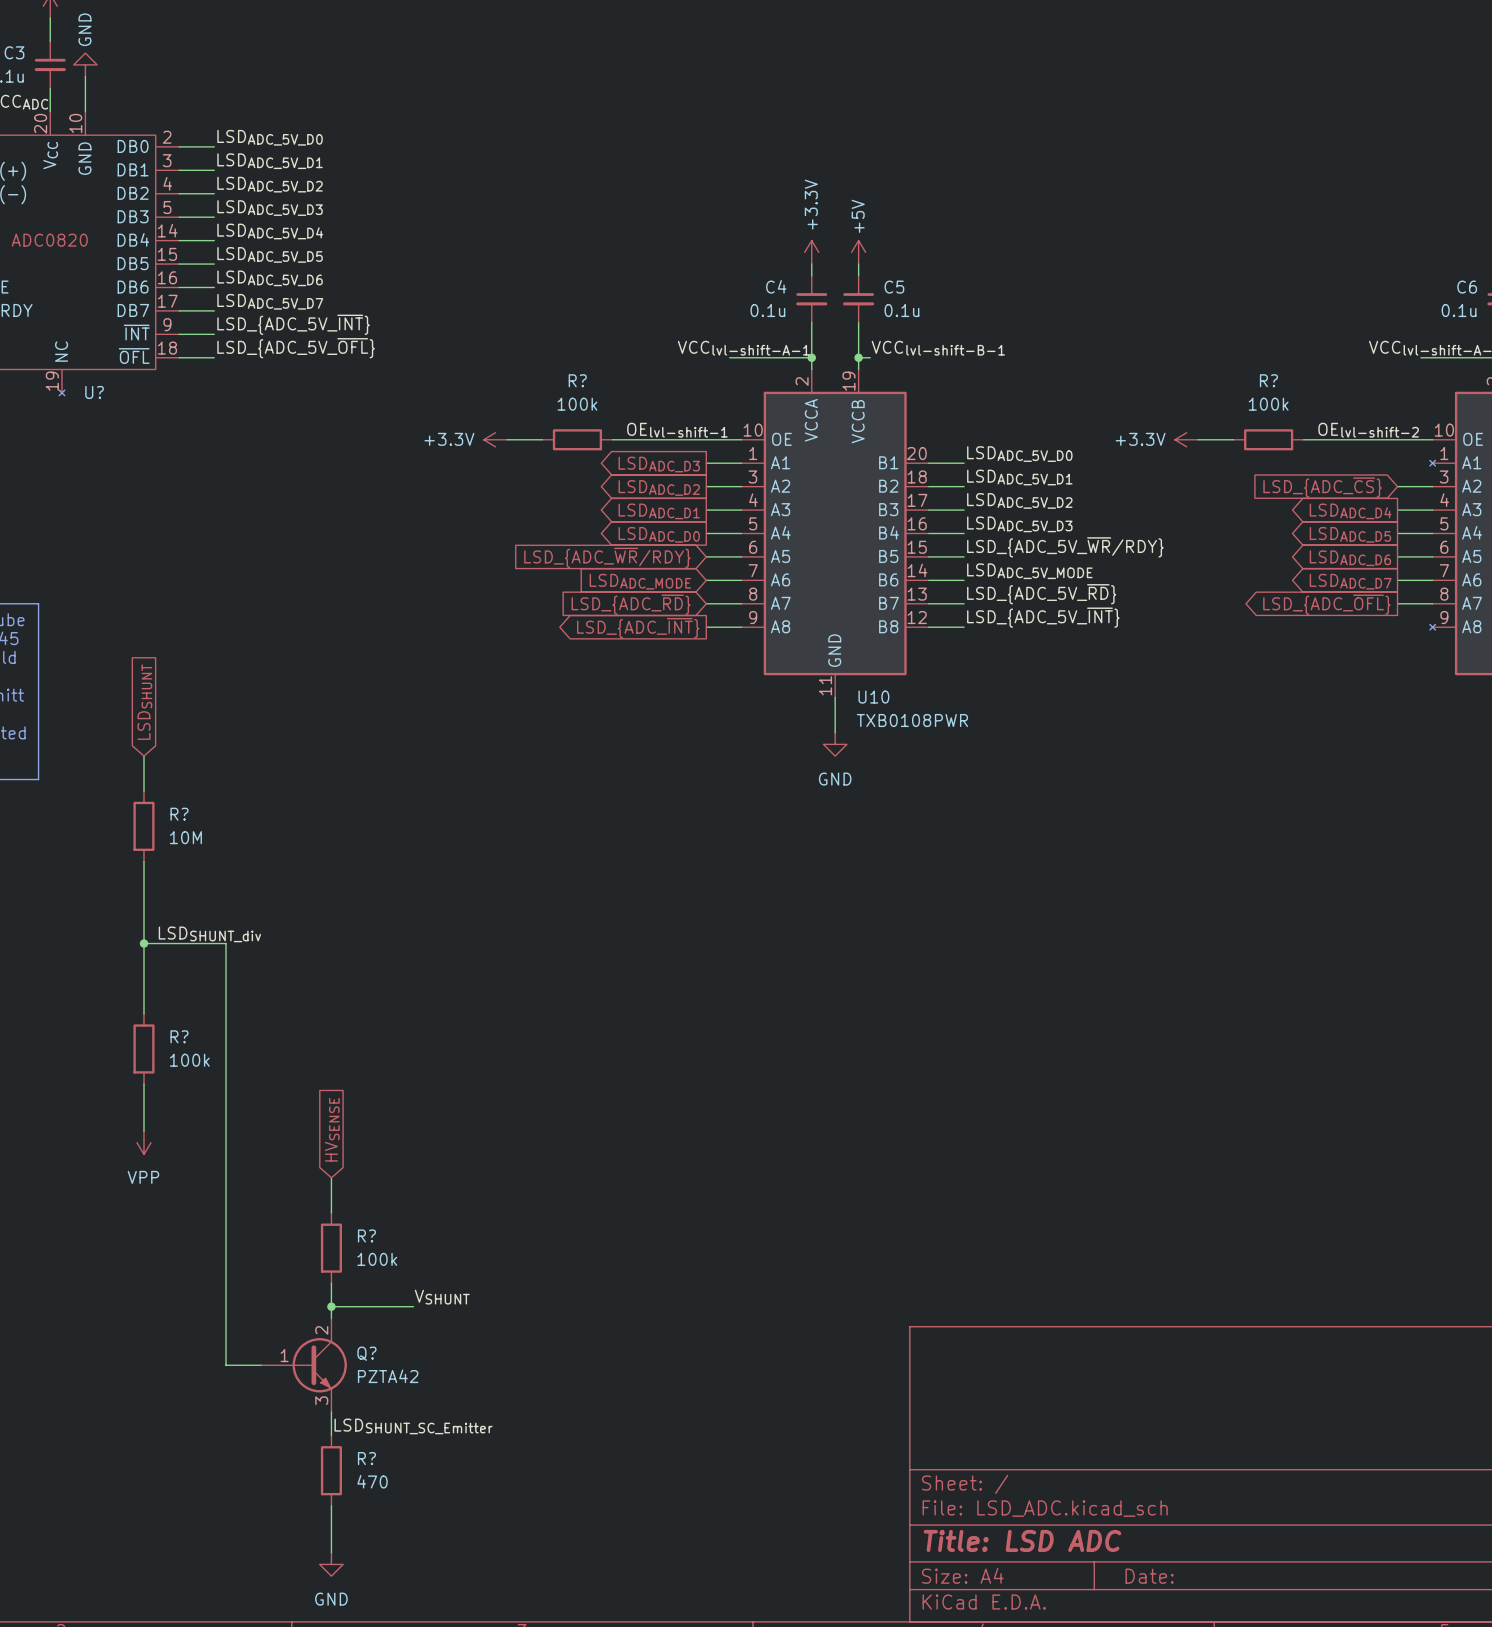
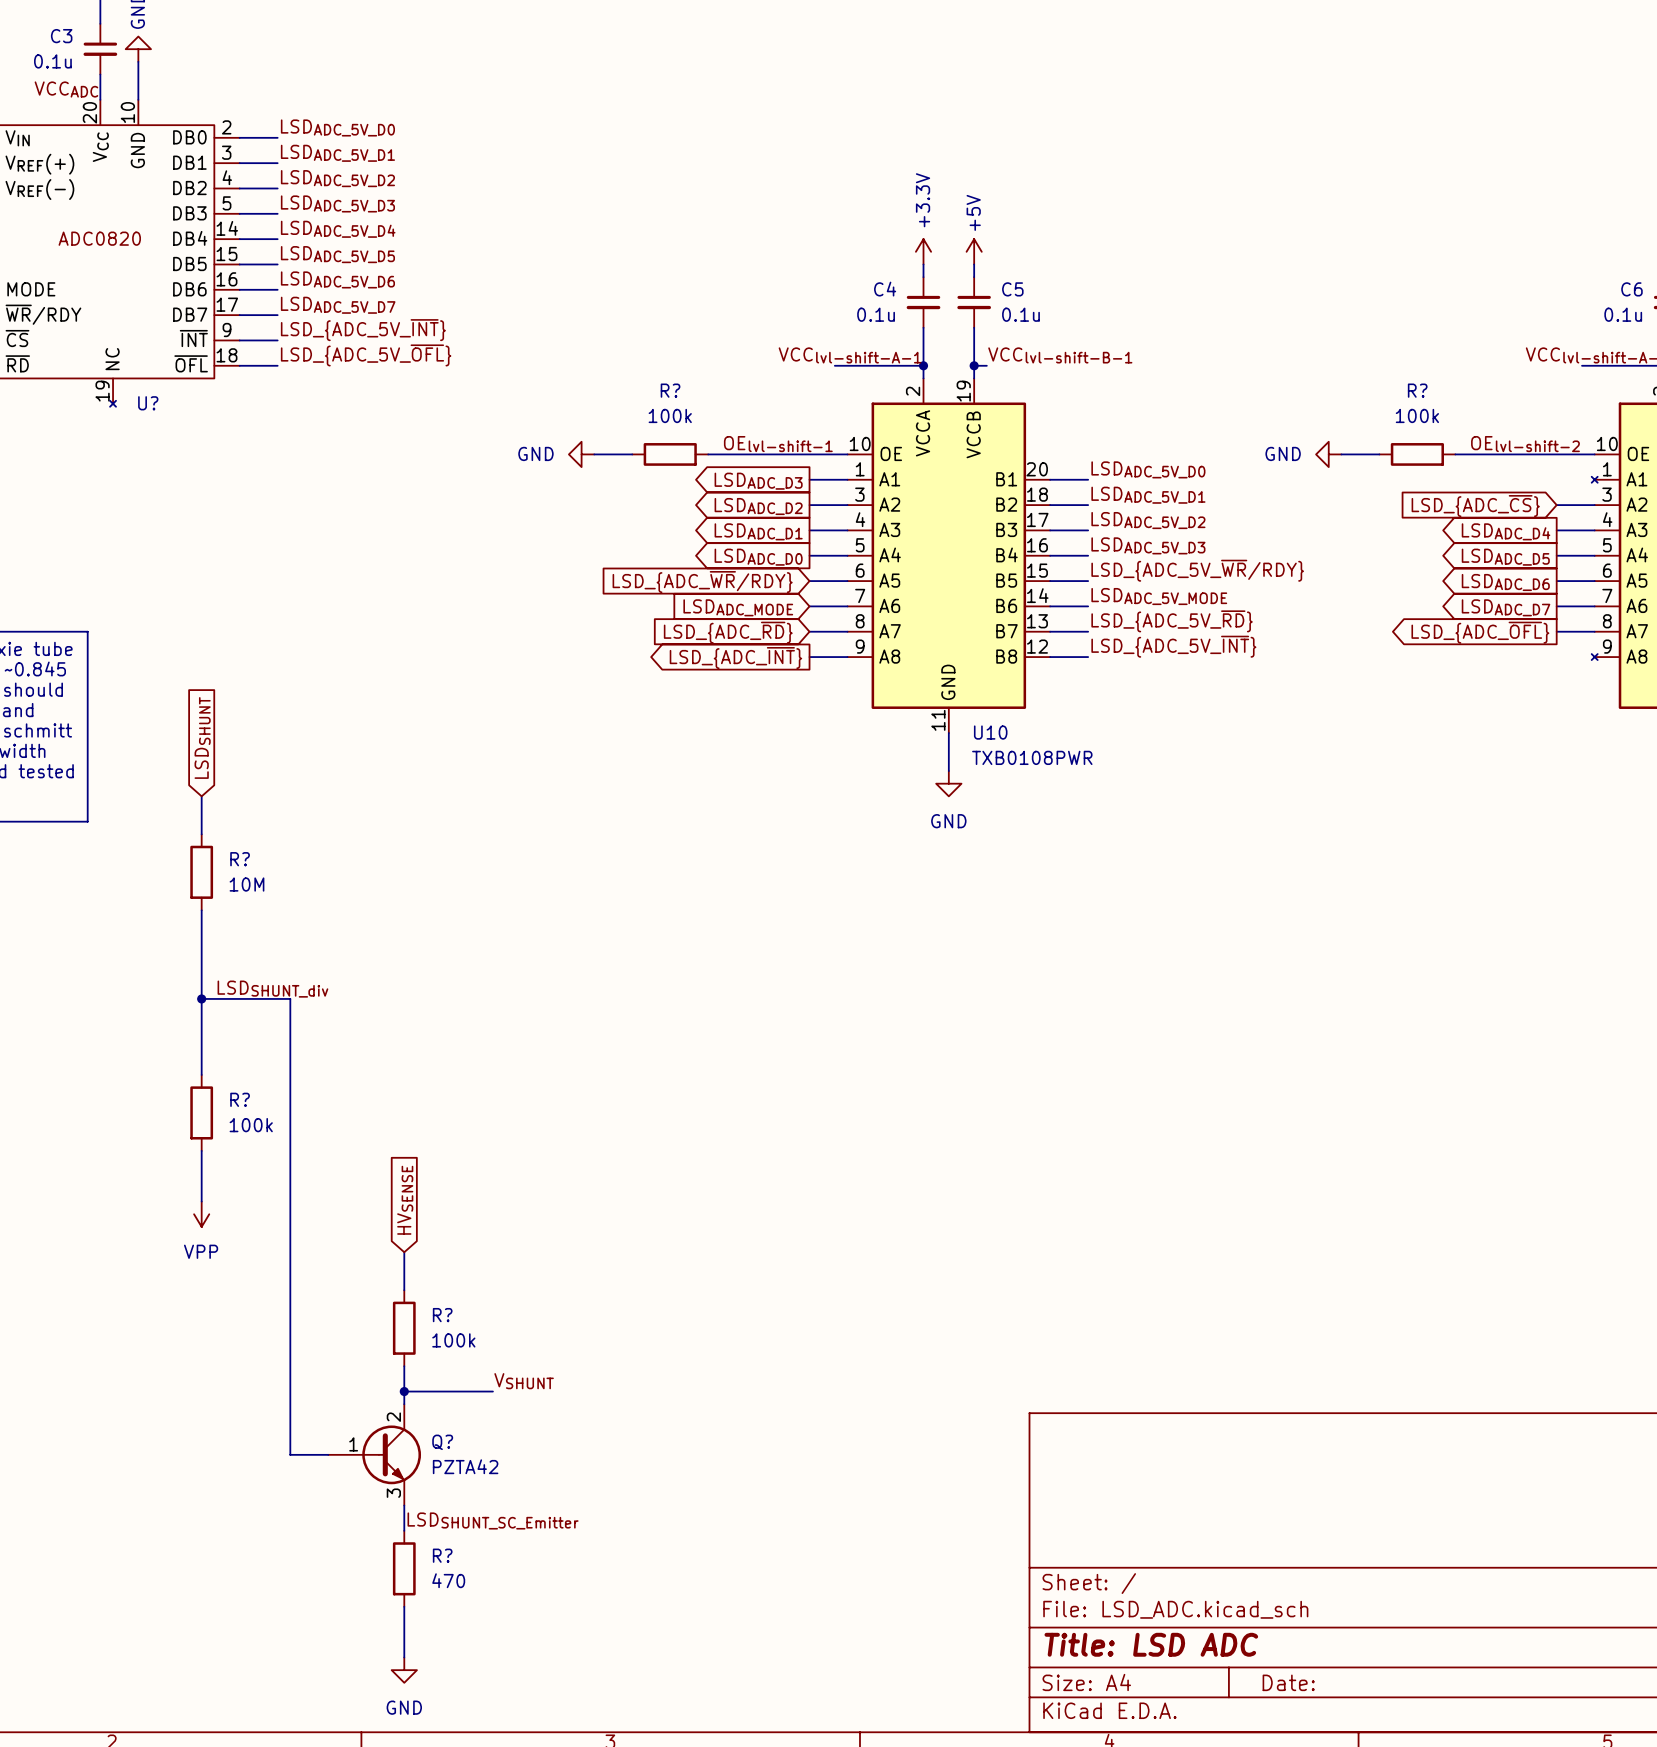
power symbol: +3.3V (495, 439) -> GND (581, 454)
power symbol: +3.3V (1186, 439) -> GND (1328, 454)

